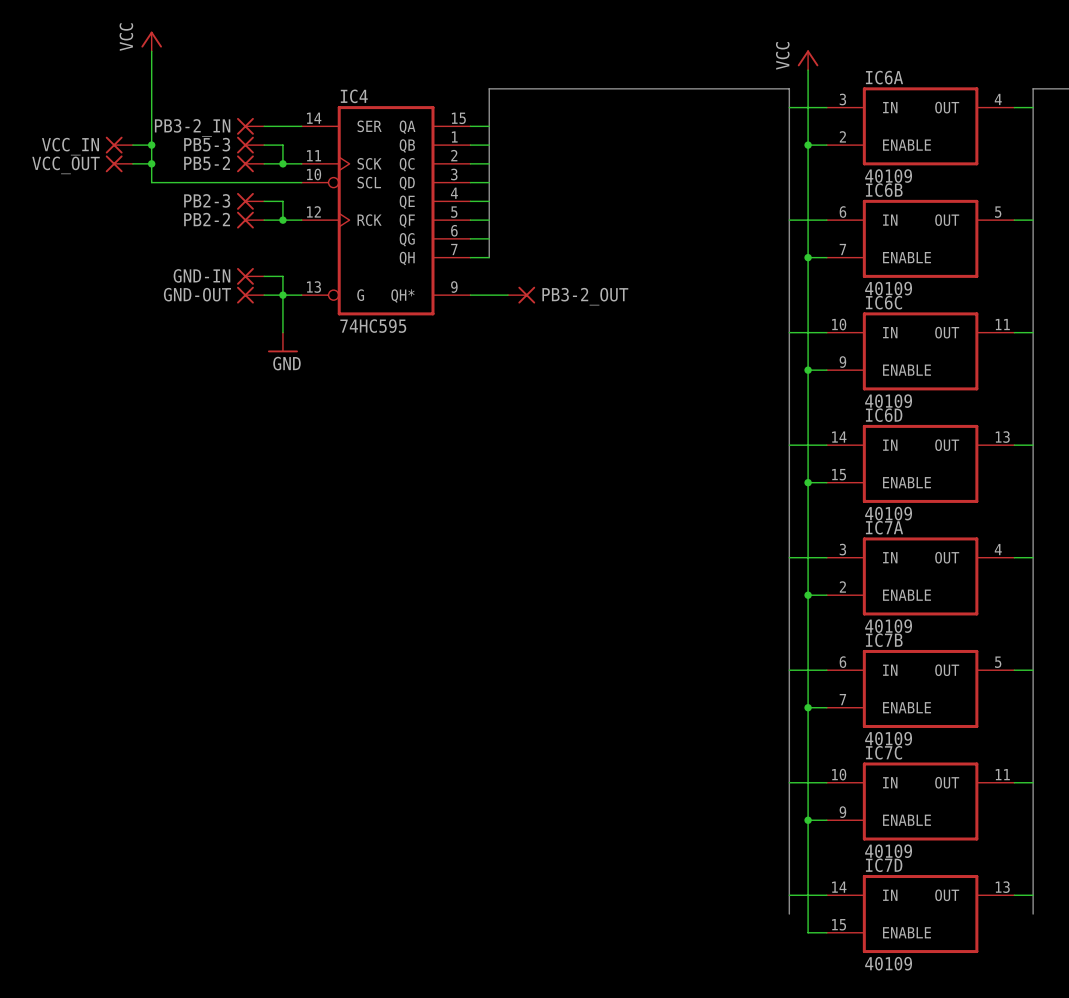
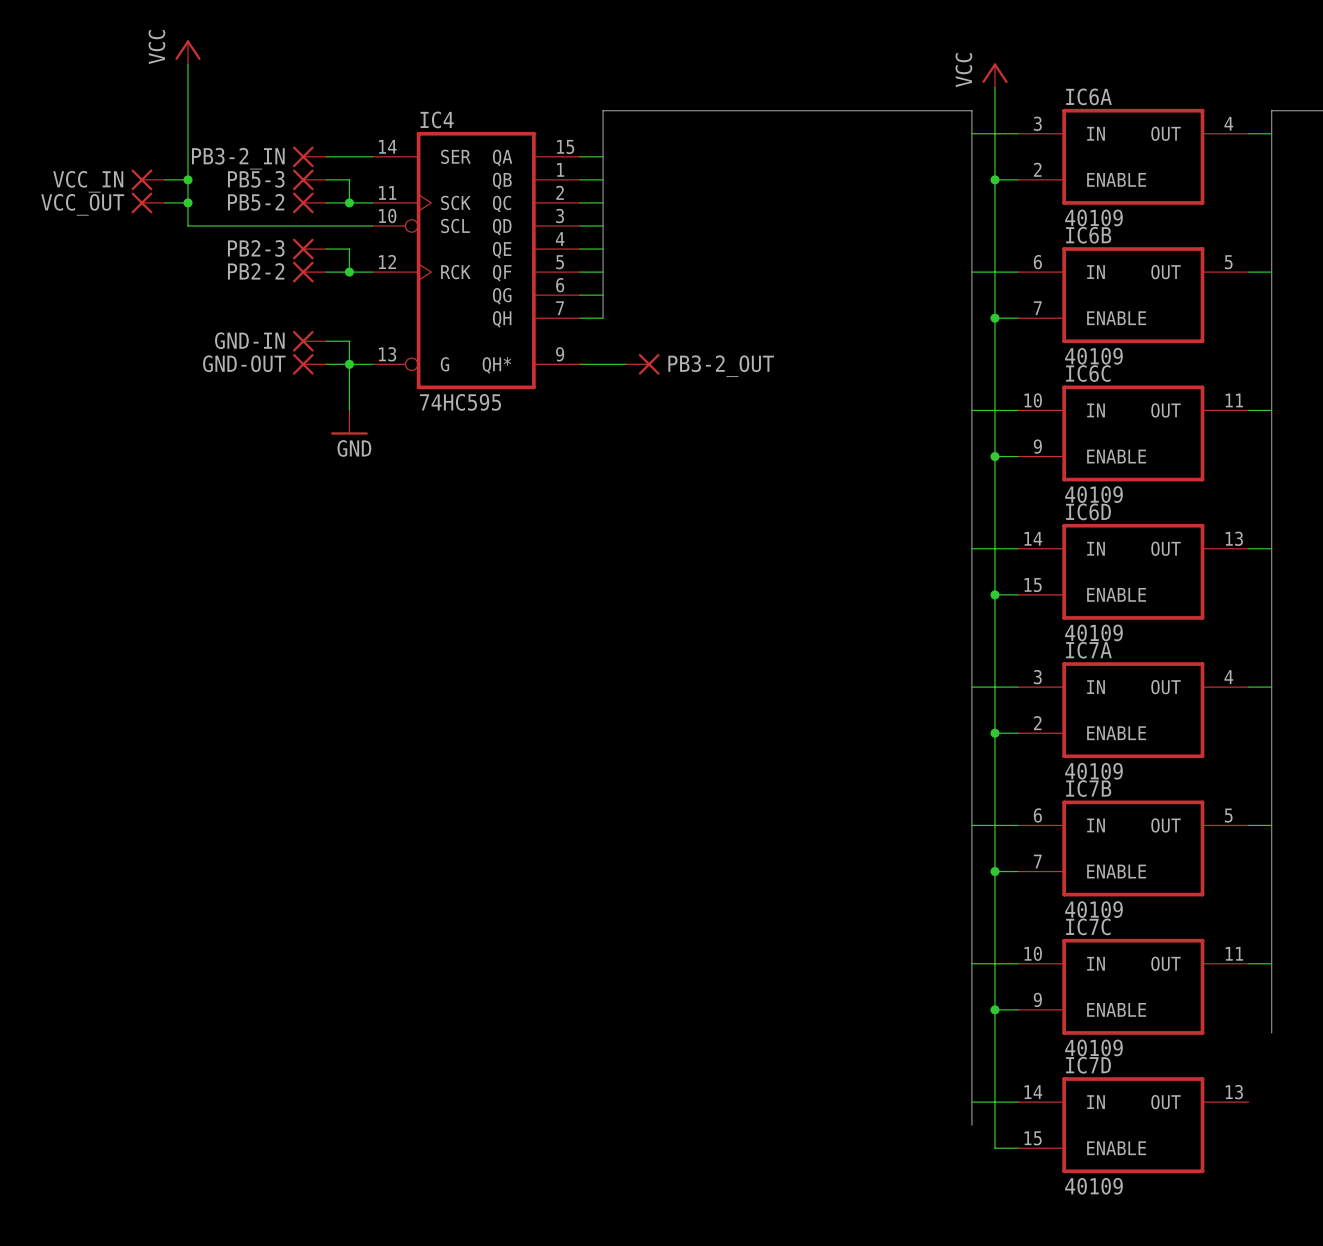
bus: (1033, 839) (1033, 914) -> none
wire: (1014, 895) (1033, 895) -> none

